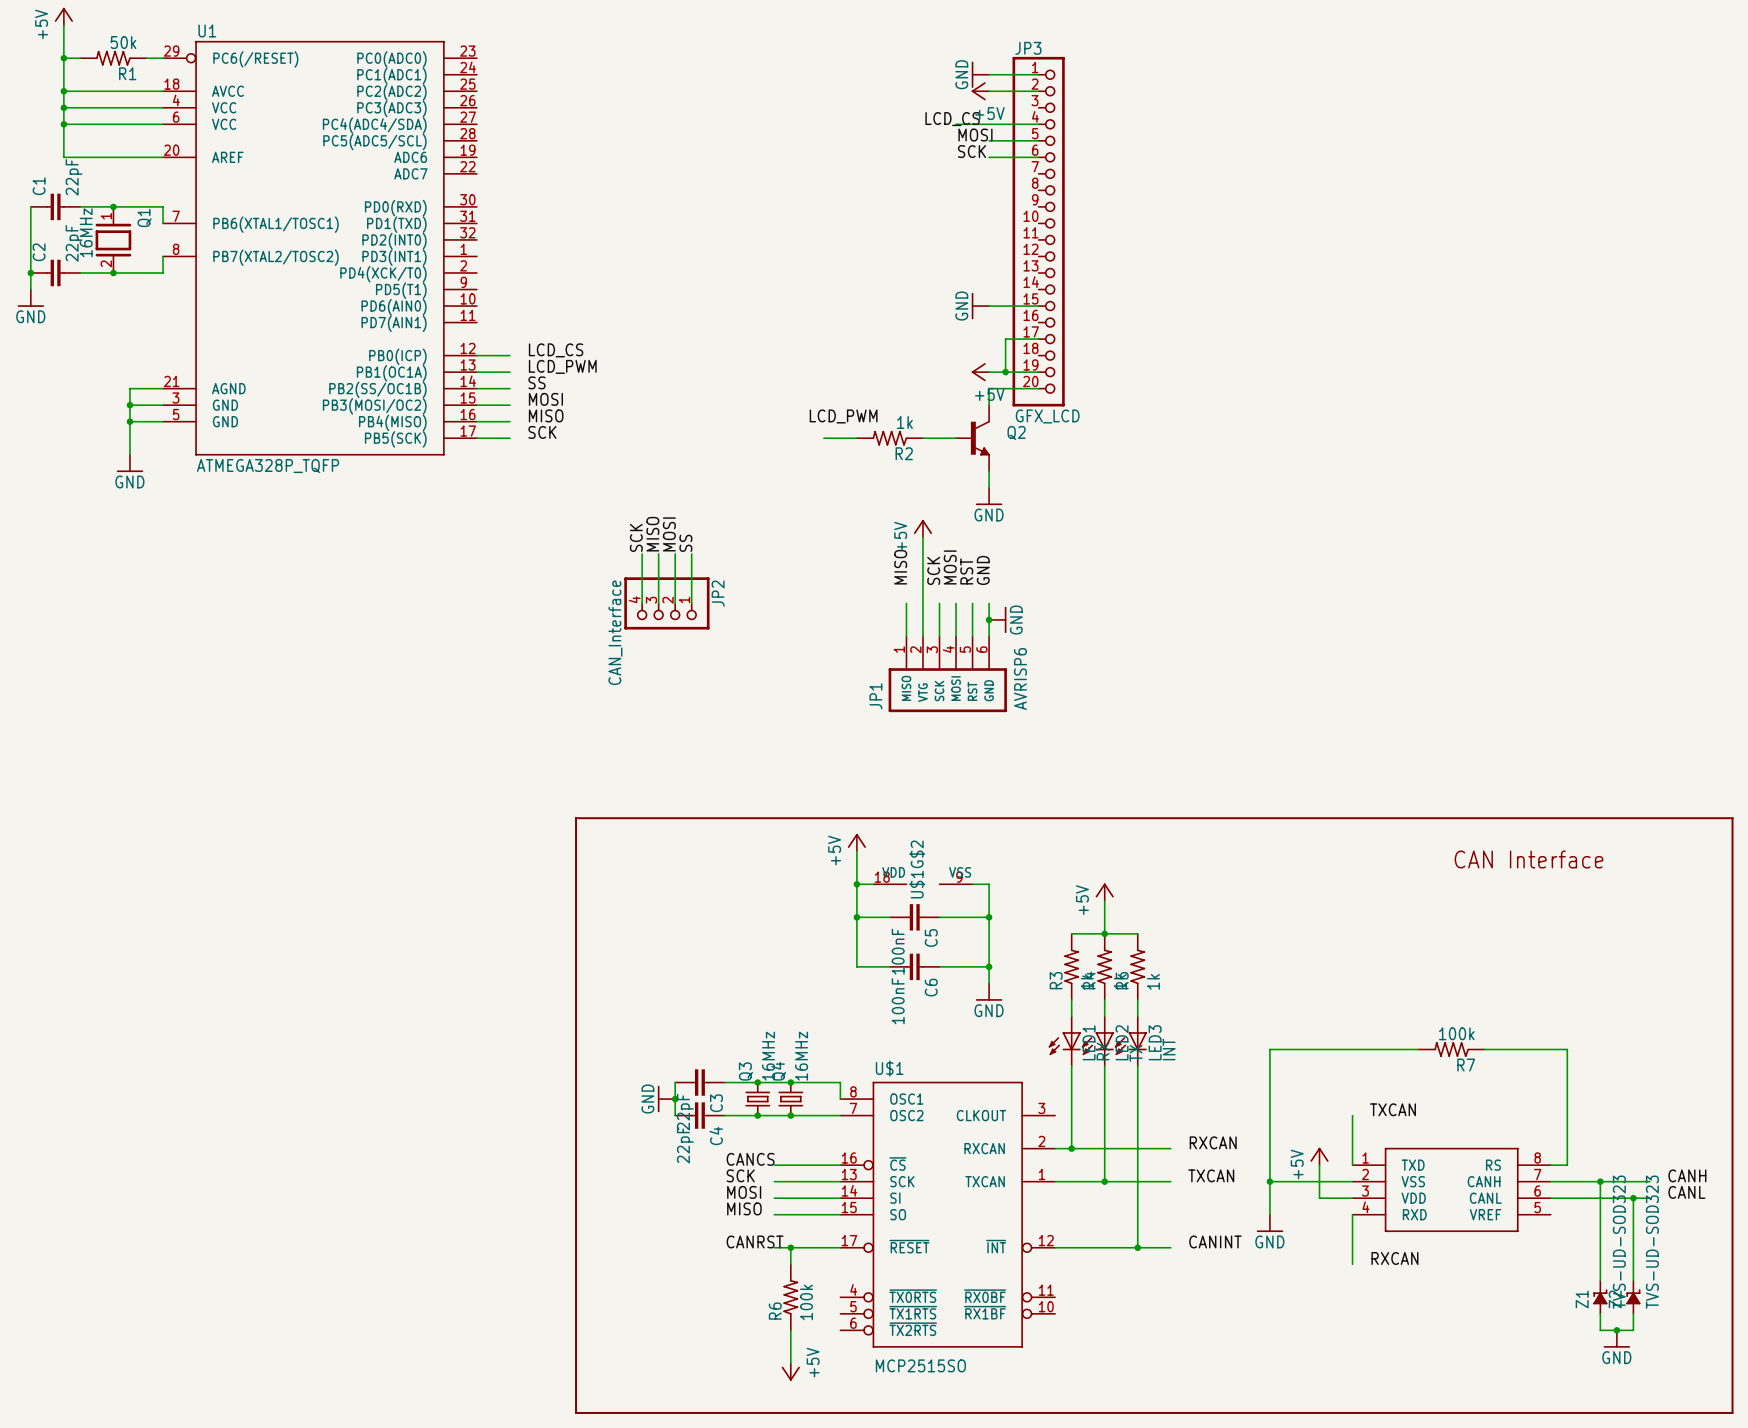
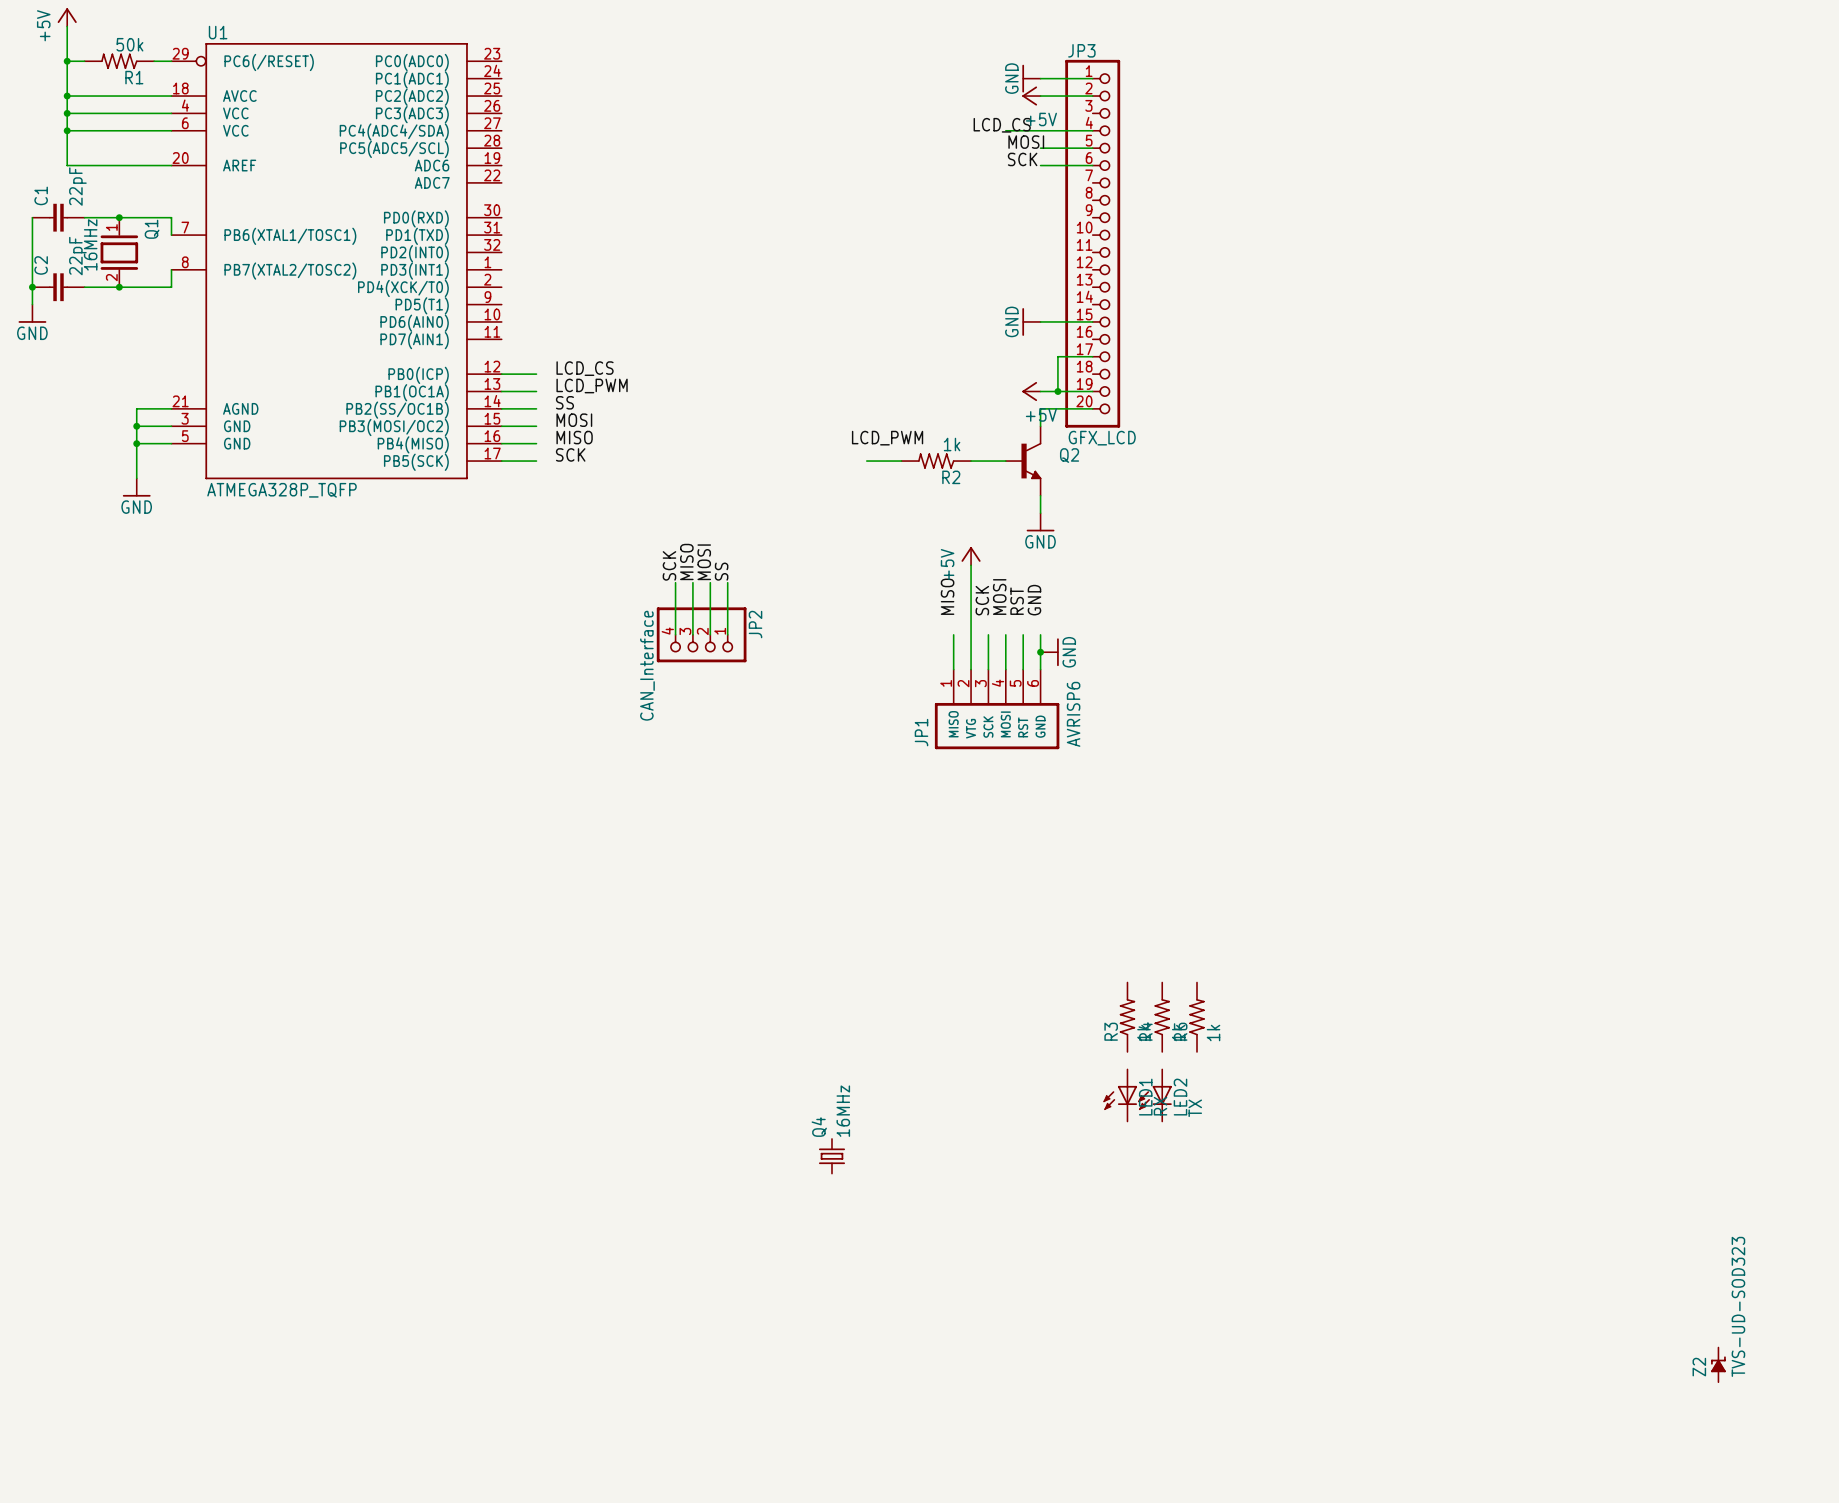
line: (576, 818) (576, 1412) (1732, 1412) (1732, 818) (576, 818) -> none
power symbol: +5V (856, 842) -> none
wire: (856, 851) (856, 966) (889, 966) -> none
text: CAN Interface (1529, 859) -> none
wire: (856, 884) (873, 884) -> none
junction: (856, 884) -> none
U$1G$2: (922, 884) -> none
wire: (972, 884) (989, 884) (989, 983) -> none
power symbol: +5V (1104, 892) -> none
wire: (1104, 900) (1104, 933) -> none
wire: (856, 917) (889, 917) -> none
junction: (856, 917) -> none
C5: 100nF (914, 917) -> none
wire: (939, 917) (989, 917) -> none
junction: (989, 917) -> none
wire: (1071, 933) (1137, 933) -> none
junction: (1104, 933) -> none
C6: 100nF (914, 966) -> none
wire: (939, 966) (989, 966) -> none
junction: (989, 966) -> none
power symbol: GND (989, 992) -> none
wire: (1071, 999) (1071, 1016) -> none
wire: (1104, 999) (1104, 1016) -> none
wire: (1137, 999) (1137, 1016) -> none
LED3: INT (1130, 1041) -> none
wire: (1418, 1049) (1269, 1049) (1269, 1214) -> none
R7: 100k (1451, 1049) -> none
wire: (1484, 1049) (1567, 1049) (1567, 1165) (1550, 1165) -> none
wire: (1071, 1066) (1071, 1148) -> none
wire: (1104, 1066) (1104, 1181) -> none
wire: (1137, 1066) (1137, 1247) -> none
wire: (675, 1082) (675, 1115) -> none
C3: 22pF (699, 1082) -> none
wire: (724, 1082) (840, 1082) (840, 1099) -> none
junction: (757, 1082) -> none
junction: (790, 1082) -> none
power symbol: GND (666, 1099) -> none
junction: (675, 1099) -> none
Q3: 16MHz (757, 1099) -> none
label: TXCAN (1392, 1109) -> none
C4: 22pF (699, 1115) -> none
wire: (724, 1115) (840, 1115) -> none
junction: (757, 1115) -> none
junction: (790, 1115) -> none
wire: (1352, 1115) (1352, 1165) -> none
label: RXCAN (1213, 1142) -> none
wire: (1055, 1148) (1170, 1148) -> none
junction: (1071, 1148) -> none
power symbol: +5V (1319, 1156) -> none
label: CANCS (750, 1159) -> none
wire: (774, 1165) (840, 1165) -> none
wire: (1319, 1165) (1319, 1198) (1352, 1198) -> none
label: SCK (740, 1175) -> none
label: TXCAN (1211, 1175) -> none
label: CANH (1687, 1175) -> none
wire: (774, 1181) (840, 1181) -> none
wire: (1055, 1181) (1170, 1181) -> none
junction: (1104, 1181) -> none
wire: (1269, 1181) (1352, 1181) -> none
junction: (1269, 1181) -> none
wire: (1550, 1181) (1649, 1181) -> none
wire: (1600, 1181) (1600, 1280) -> none
junction: (1600, 1181) -> none
part: (1451, 1189) -> none
label: MOSI (744, 1192) -> none
label: CANL (1686, 1192) -> none
wire: (774, 1198) (840, 1198) -> none
wire: (1550, 1198) (1649, 1198) -> none
wire: (1633, 1198) (1633, 1280) -> none
junction: (1633, 1198) -> none
label: MISO (744, 1208) -> none
wire: (774, 1214) (840, 1214) -> none
U$1: MCP2515SO (947, 1214) -> none
wire: (1352, 1214) (1352, 1264) -> none
power symbol: GND (1269, 1223) -> none
label: CANRST (755, 1241) -> none
label: CANINT (1215, 1241) -> none
wire: (774, 1247) (840, 1247) -> none
wire: (790, 1247) (790, 1264) -> none
junction: (790, 1247) -> none
wire: (1055, 1247) (1170, 1247) -> none
junction: (1137, 1247) -> none
label: RXCAN (1394, 1258) -> none
R6: 100k (790, 1297) -> none
Z1: TVS-UD-SOD323 (1600, 1297) -> none
wire: (1600, 1313) (1600, 1330) (1633, 1330) (1633, 1313) -> none
wire: (790, 1330) (790, 1363) -> none
junction: (1616, 1330) -> none
power symbol: GND (1616, 1339) -> none
power symbol: +5V (790, 1372) -> none

